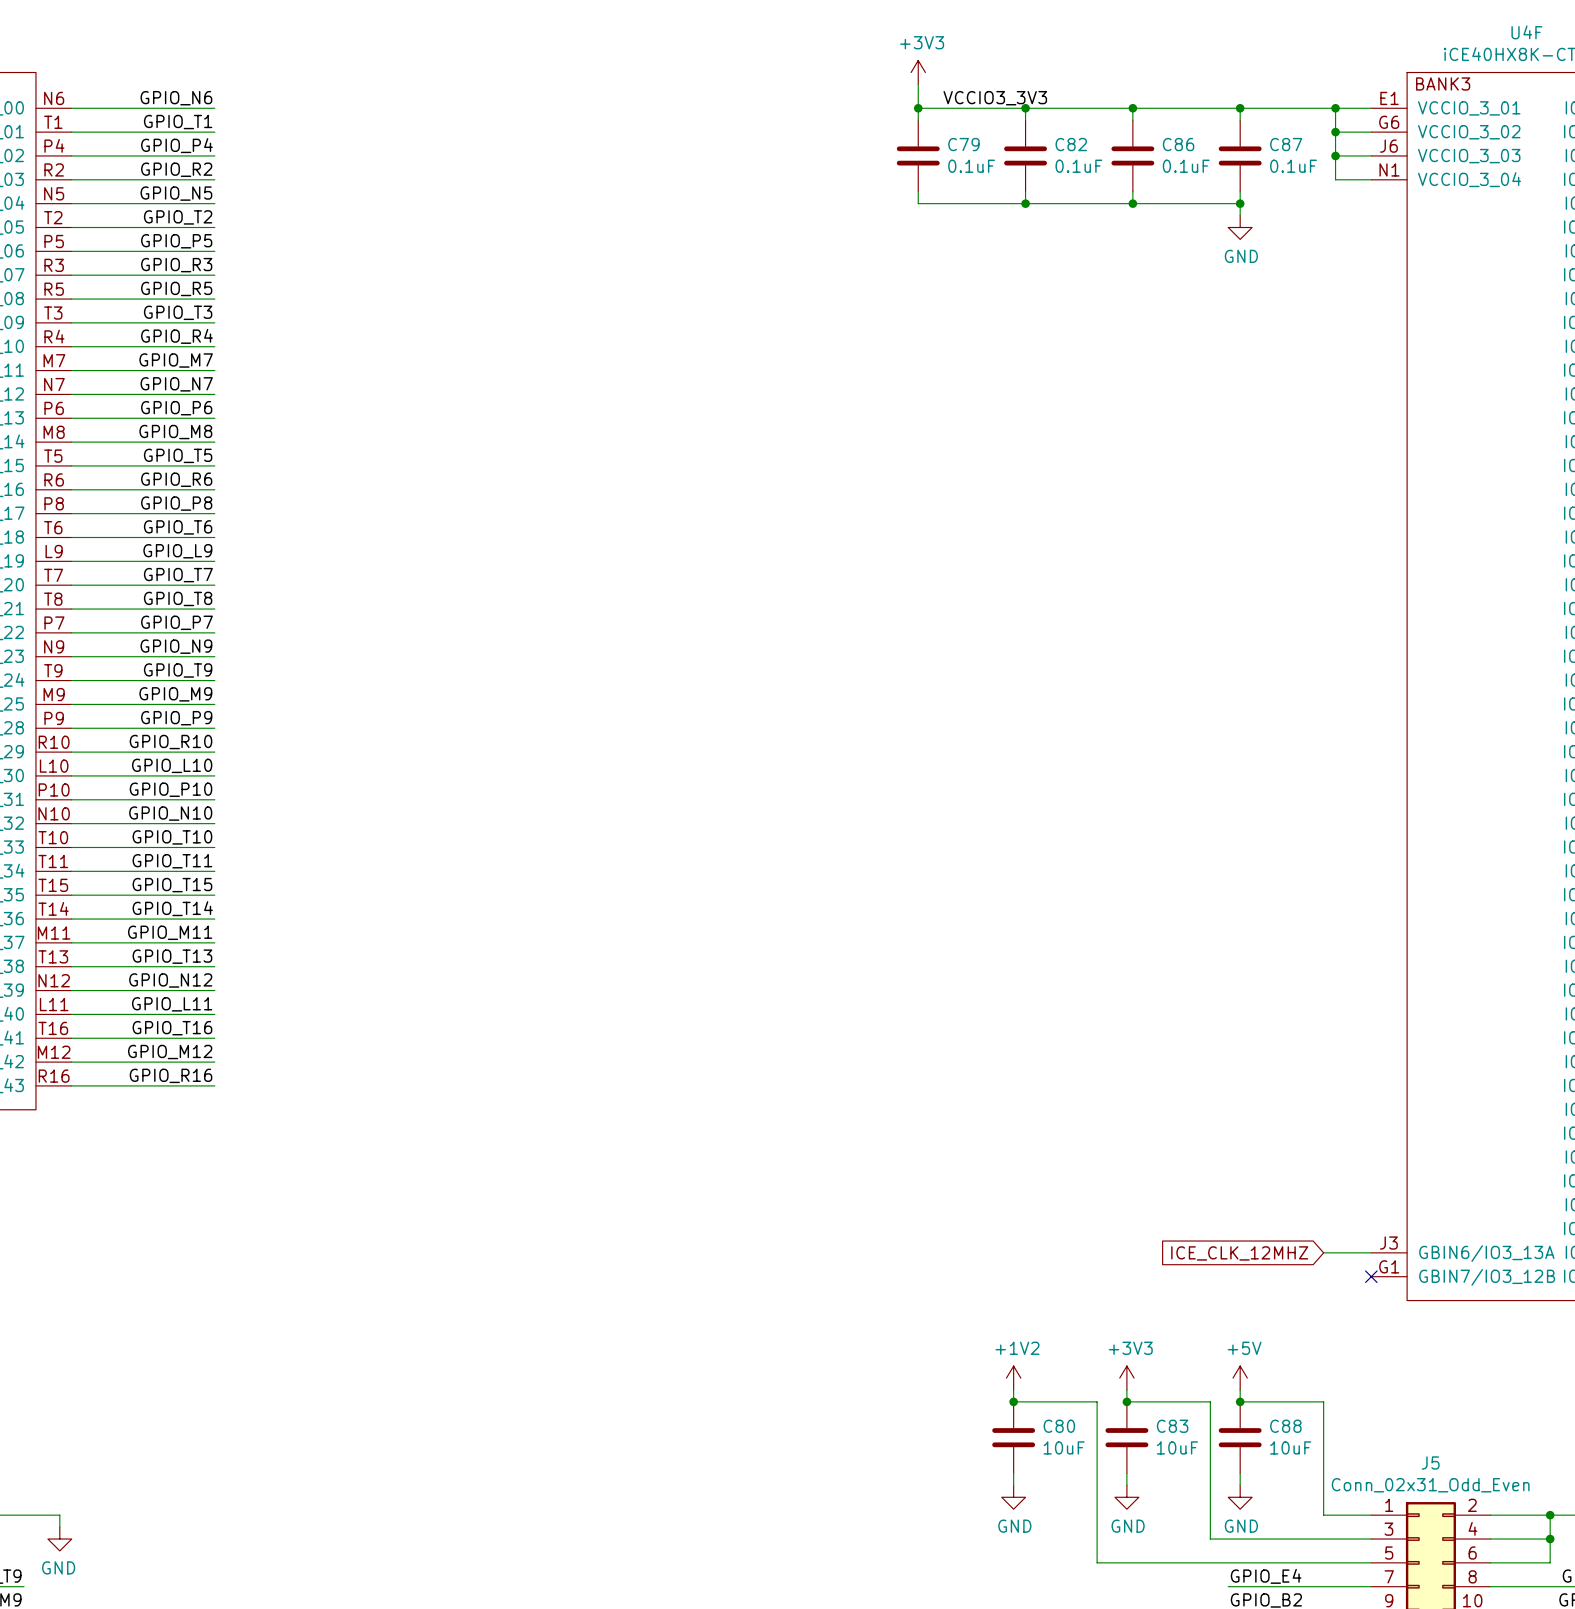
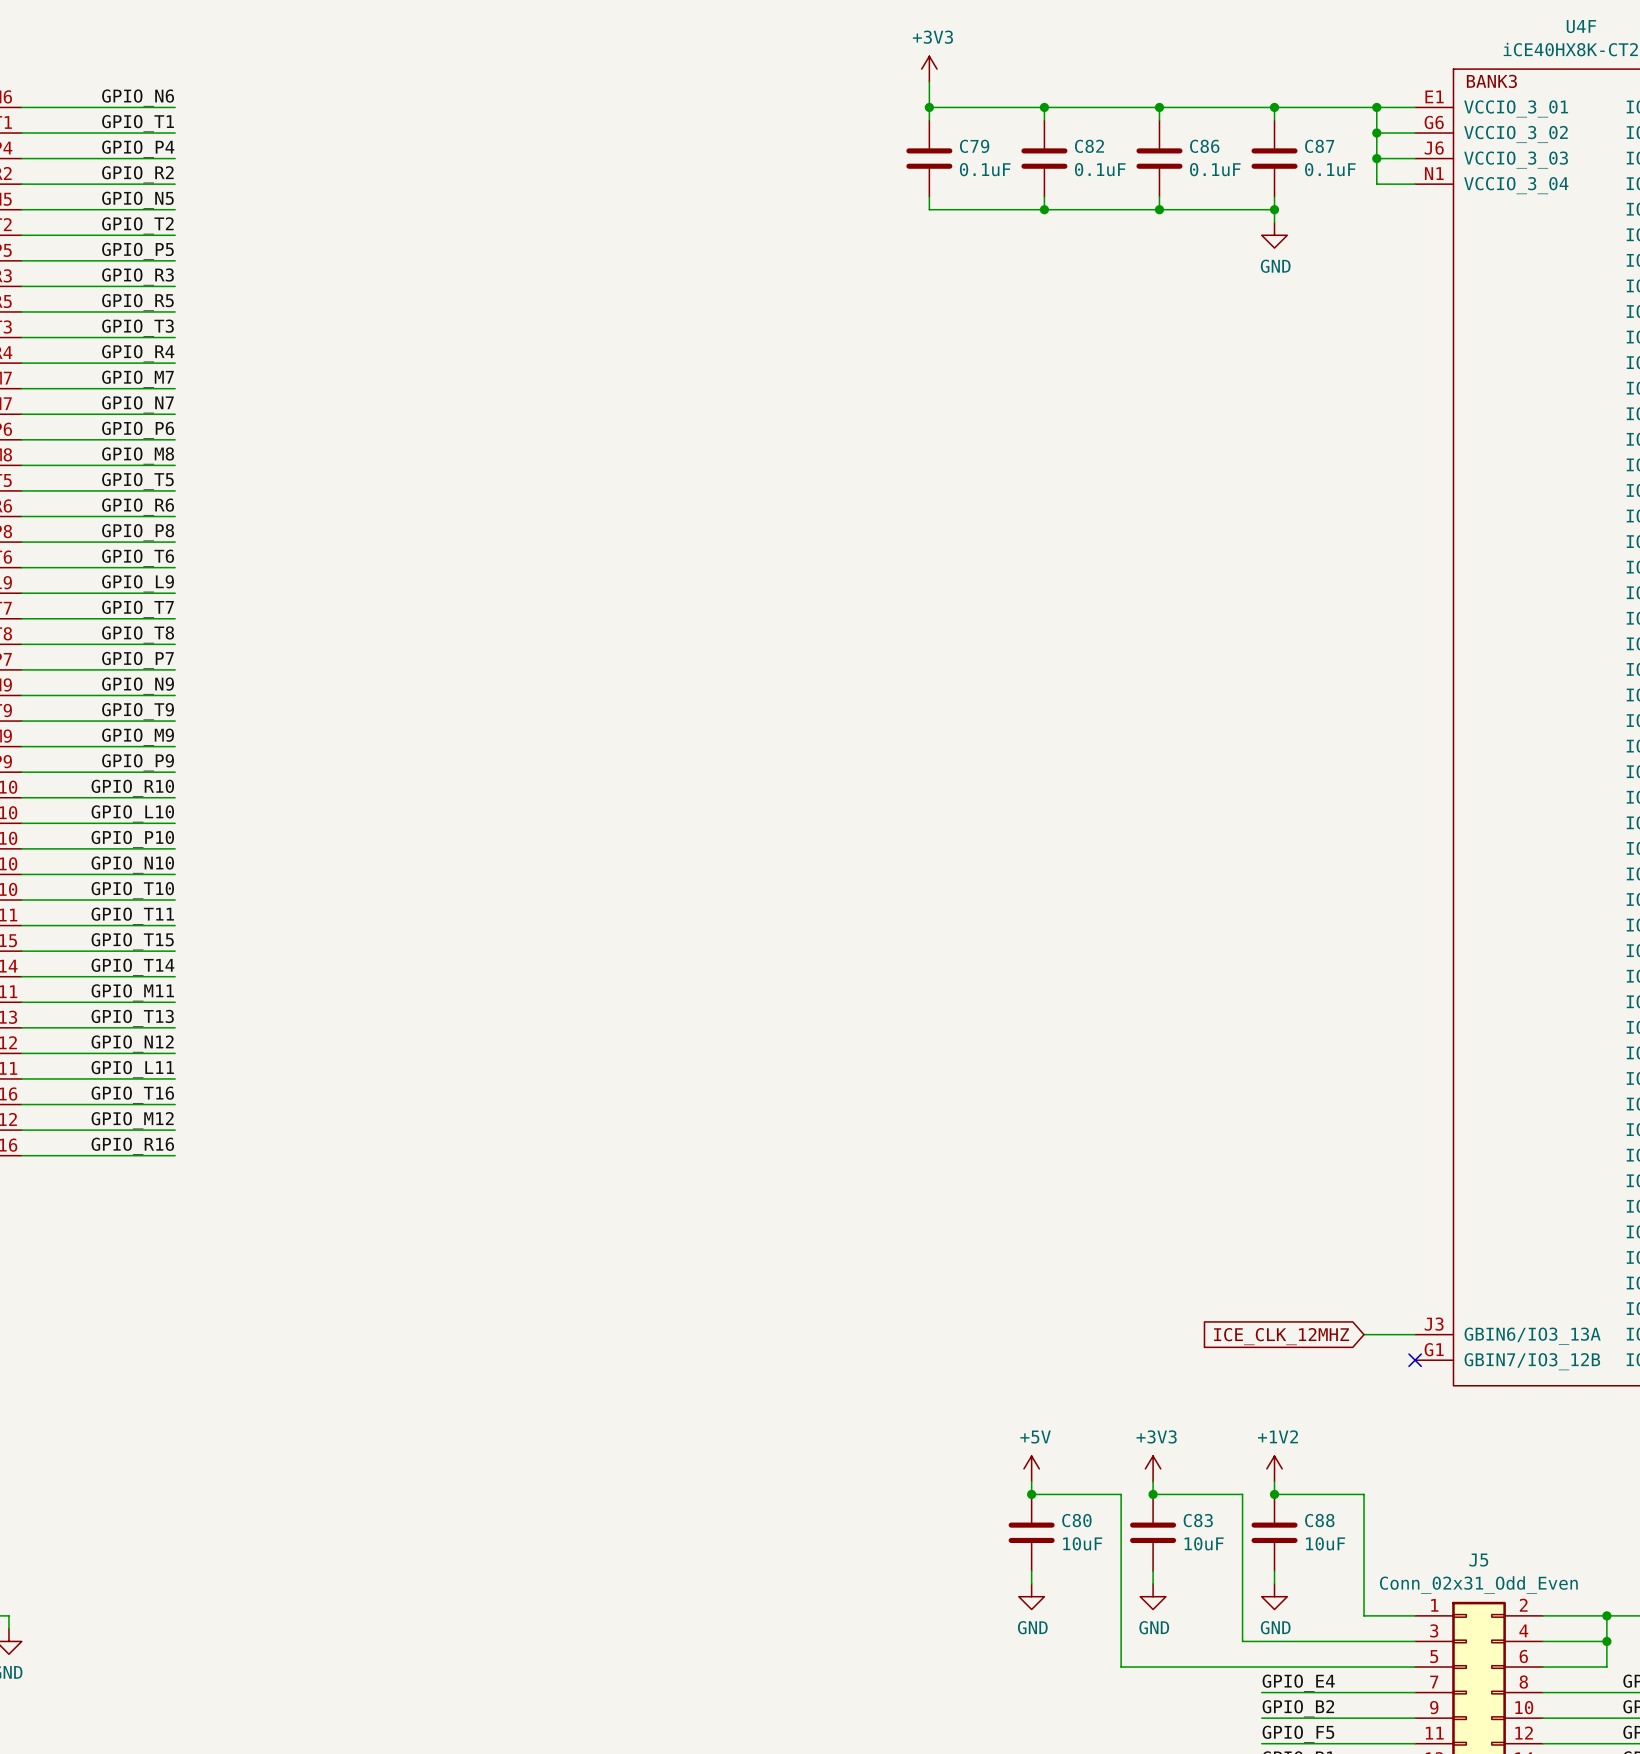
label: VCCIO3_3V3 (995, 98) -> none
power symbol: +1V2 (1013, 1378) -> +5V (1031, 1468)
power symbol: +5V (1240, 1378) -> +1V2 (1274, 1468)

